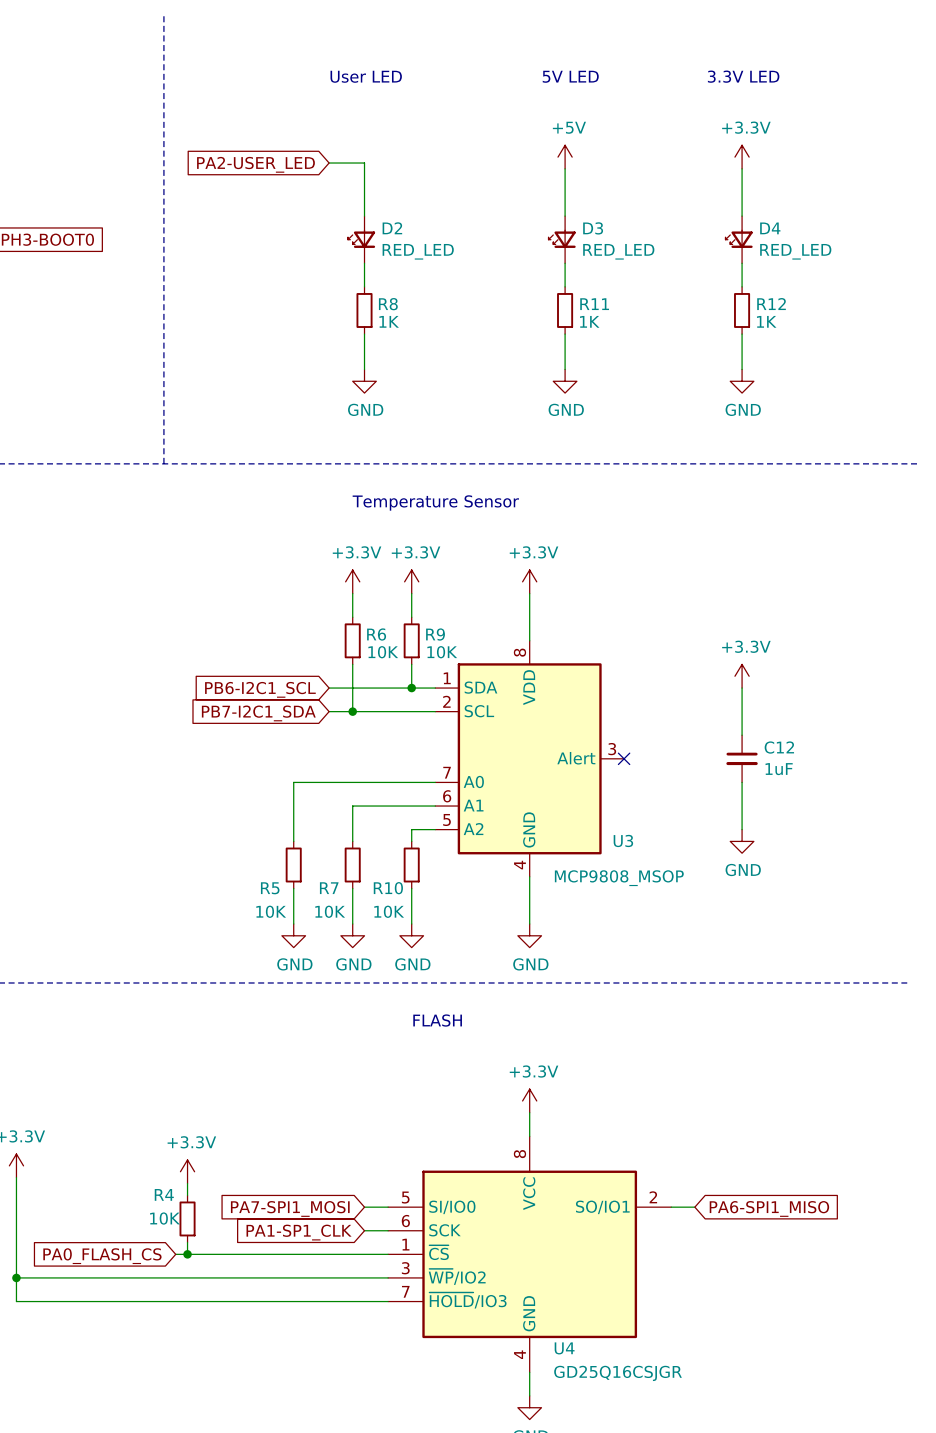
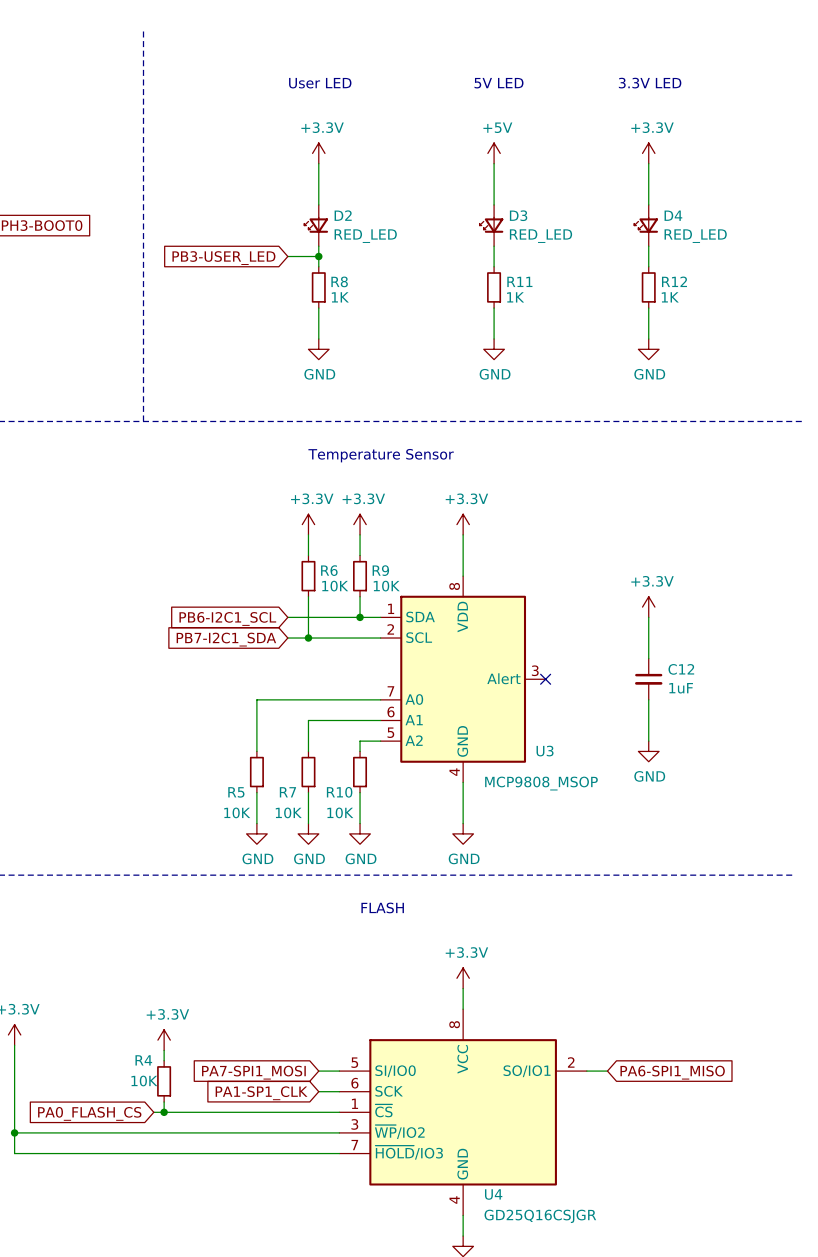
power symbol: none -> +3.3V (318, 153)
wire: (329, 163) (364, 163) (364, 168) -> none
global label: PA2-USER_LED (255, 164) -> none
wire: none -> (287, 256) (318, 256)
junction: none -> (318, 256)
global label: none -> PB3-USER_LED (223, 258)

